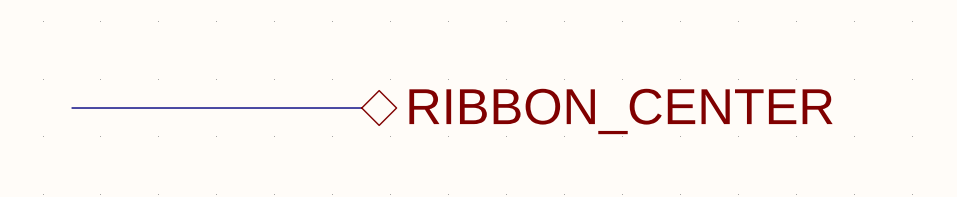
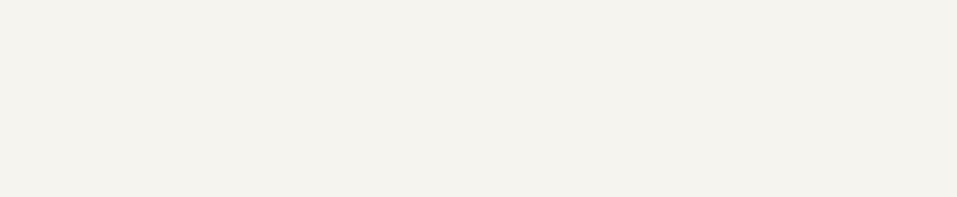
bus: (72, 108) (361, 108) -> none
hierarchical label: RIBBON_CENTER (621, 111) -> none

